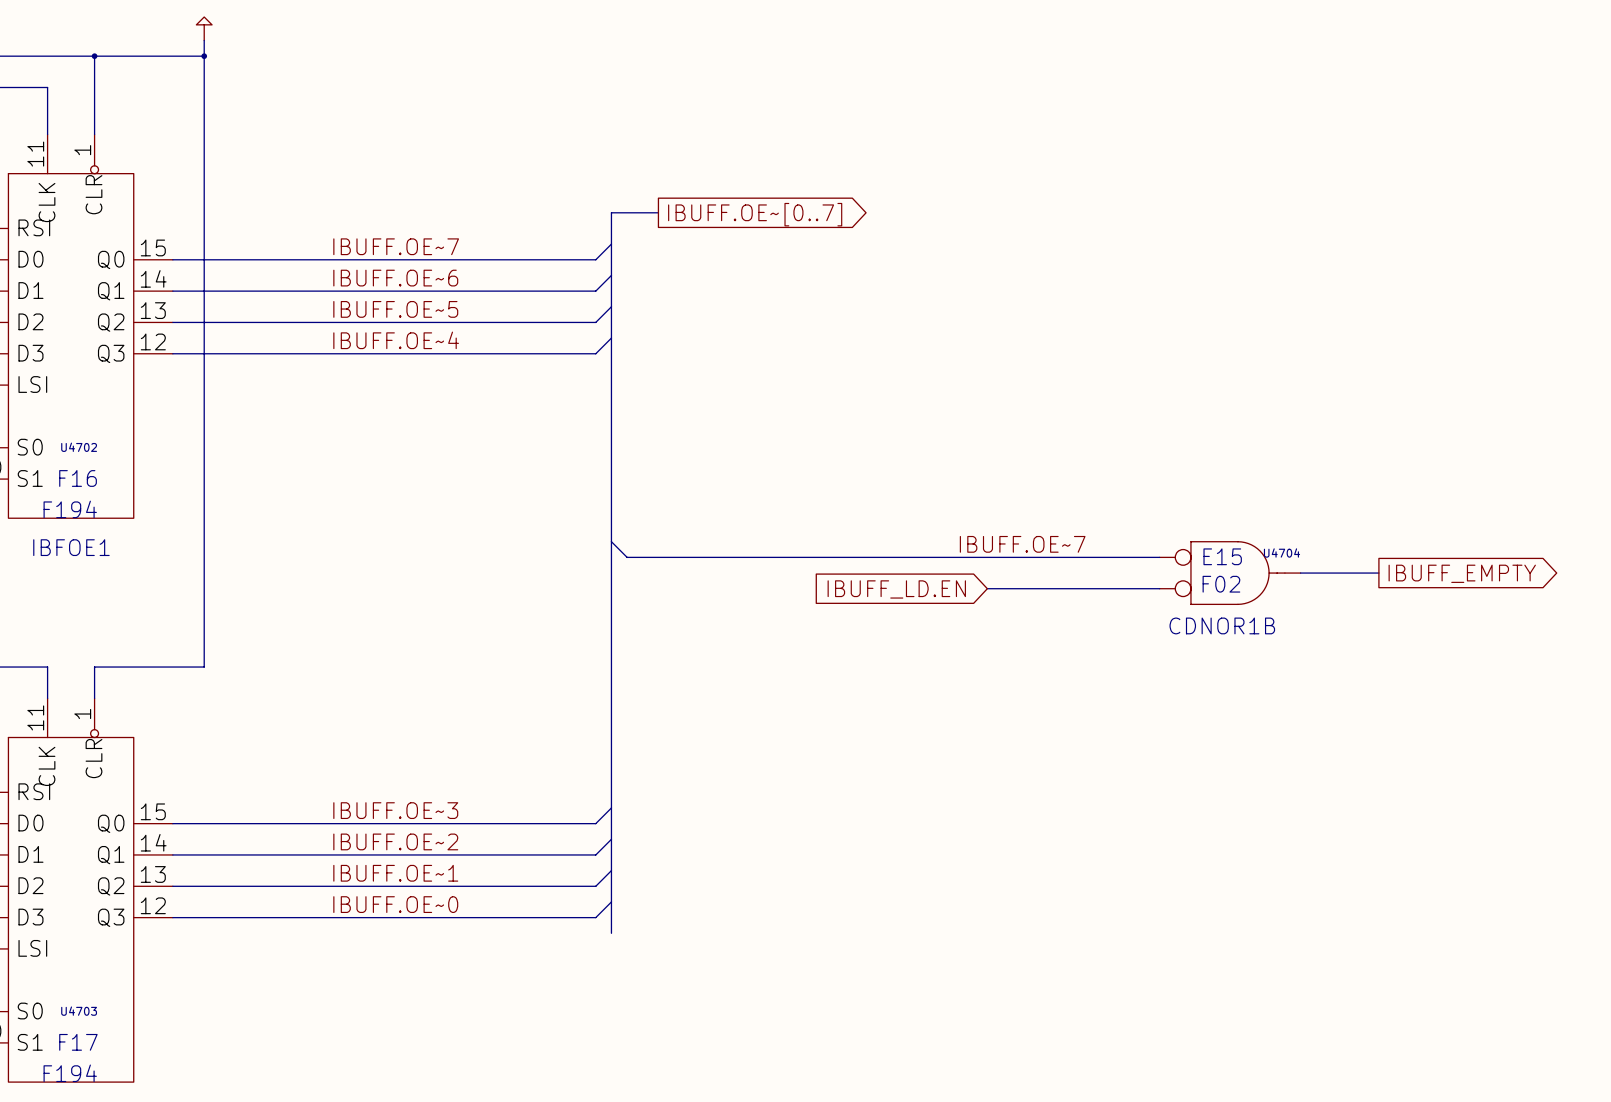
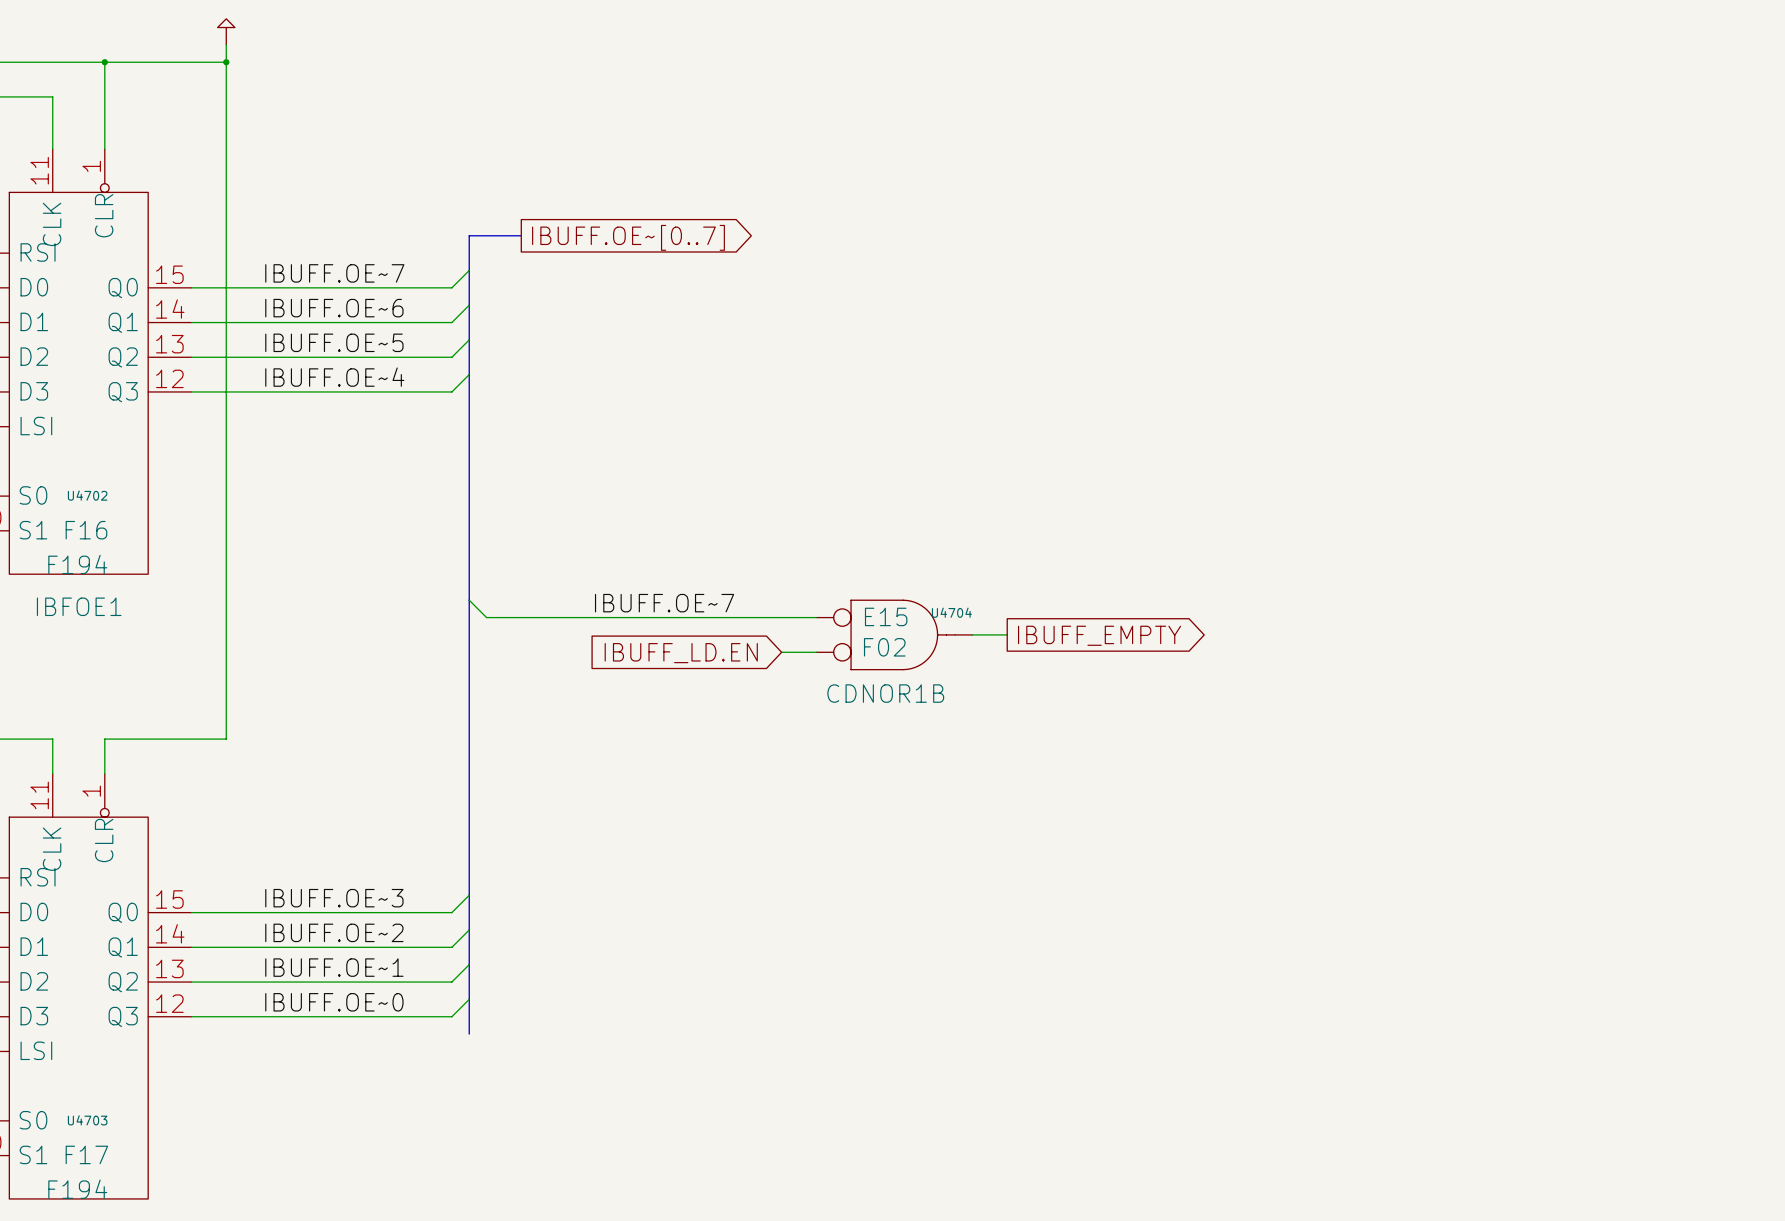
bus: none -> (521, 235) (469, 235) (469, 1034)
bus: (658, 212) (611, 212) (611, 933) -> none
global label: none -> IBUFF.OE~[0..7] (628, 237)
global label: IBUFF.OE~[0..7] (755, 214) -> none
wire: (611, 244) (595, 259) (407, 259) -> (469, 270) (451, 287)
label position: IBUFF.OE~7 (396, 246) -> IBUFF.OE~7 (334, 273)
wire: (611, 275) (595, 291) (407, 291) -> (469, 305) (451, 322)
label position: IBUFF.OE~6 (395, 278) -> IBUFF.OE~6 (334, 308)
wire: (611, 306) (595, 322) (407, 322) -> (469, 339) (451, 357)
label position: IBUFF.OE~5 (395, 309) -> IBUFF.OE~5 (334, 342)
wire: (611, 338) (595, 353) (407, 353) -> (469, 374) (451, 391)
label position: IBUFF.OE~4 (396, 340) -> IBUFF.OE~4 (334, 377)
wire: (611, 541) (627, 557) -> (469, 600) (486, 617) (694, 617)
label: none -> IBUFF.OE~7 (664, 603)
label: IBUFF.OE~7 (1022, 544) -> none
wire: (736, 557) (1159, 557) -> none
wire: none -> (972, 634) (1007, 634)
U4704 position: (1230, 573) -> (894, 634)
wire: (1300, 573) (1378, 573) -> none
global label: IBUFF_EMPTY (1462, 573) -> none
wire: none -> (781, 652) (816, 652)
wire: (987, 588) (1159, 588) -> none
global label: none -> IBUFF_LD.EN (681, 653)
global label shape: input (896, 589) -> output (1099, 635)
global label: IBUFF_LD.EN (896, 589) -> IBUFF_EMPTY (1099, 635)
wire: (611, 807) (595, 823) (407, 823) -> (469, 895) (451, 912)
label position: IBUFF.OE~3 (395, 810) -> IBUFF.OE~3 (334, 898)
wire: (611, 839) (595, 854) (407, 854) -> (469, 929) (451, 947)
label position: IBUFF.OE~2 (395, 841) -> IBUFF.OE~2 (334, 932)
wire: (611, 870) (595, 886) (407, 886) -> (469, 964) (451, 982)
label position: IBUFF.OE~1 (395, 873) -> IBUFF.OE~1 (334, 967)
wire: (611, 901) (595, 917) (407, 917) -> (469, 999) (451, 1016)
label position: IBUFF.OE~0 (395, 904) -> IBUFF.OE~0 (334, 1002)

